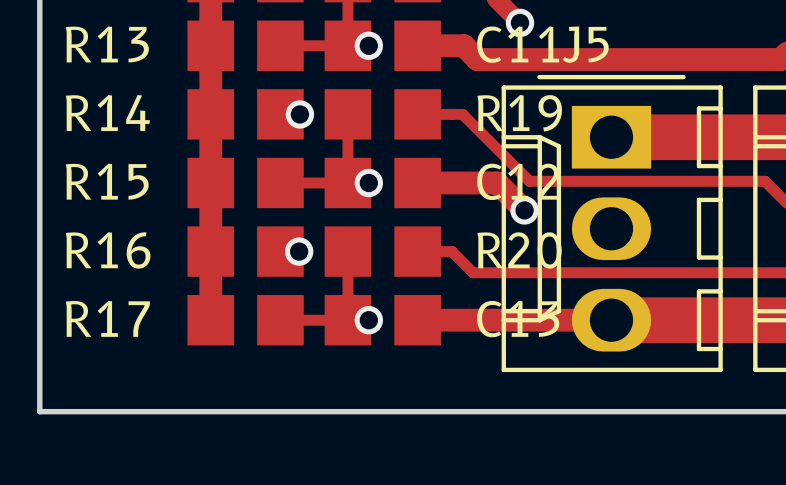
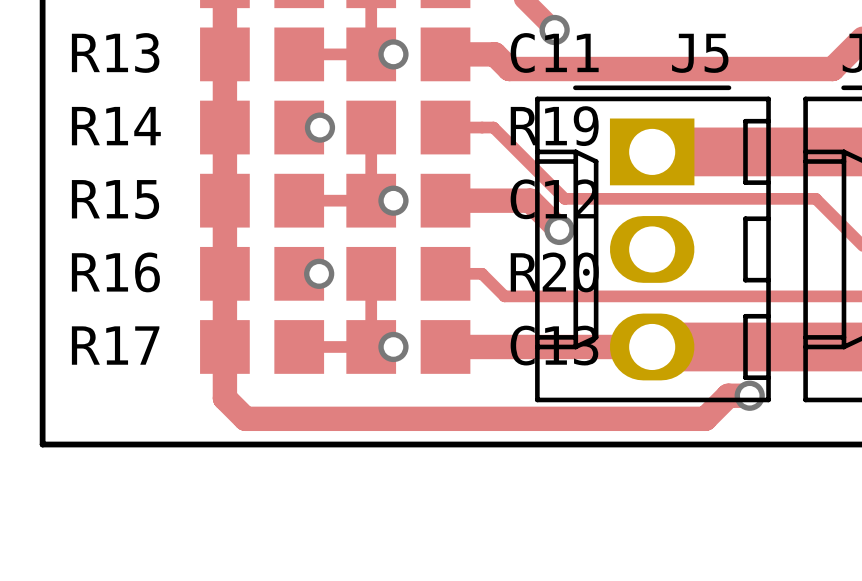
J5 name position: J5 (585, 44) -> J5 (700, 53)
track: none -> (224, 346) (224, 398) (245, 418) (705, 418) (728, 395) (749, 395)
via: none -> (749, 395)

